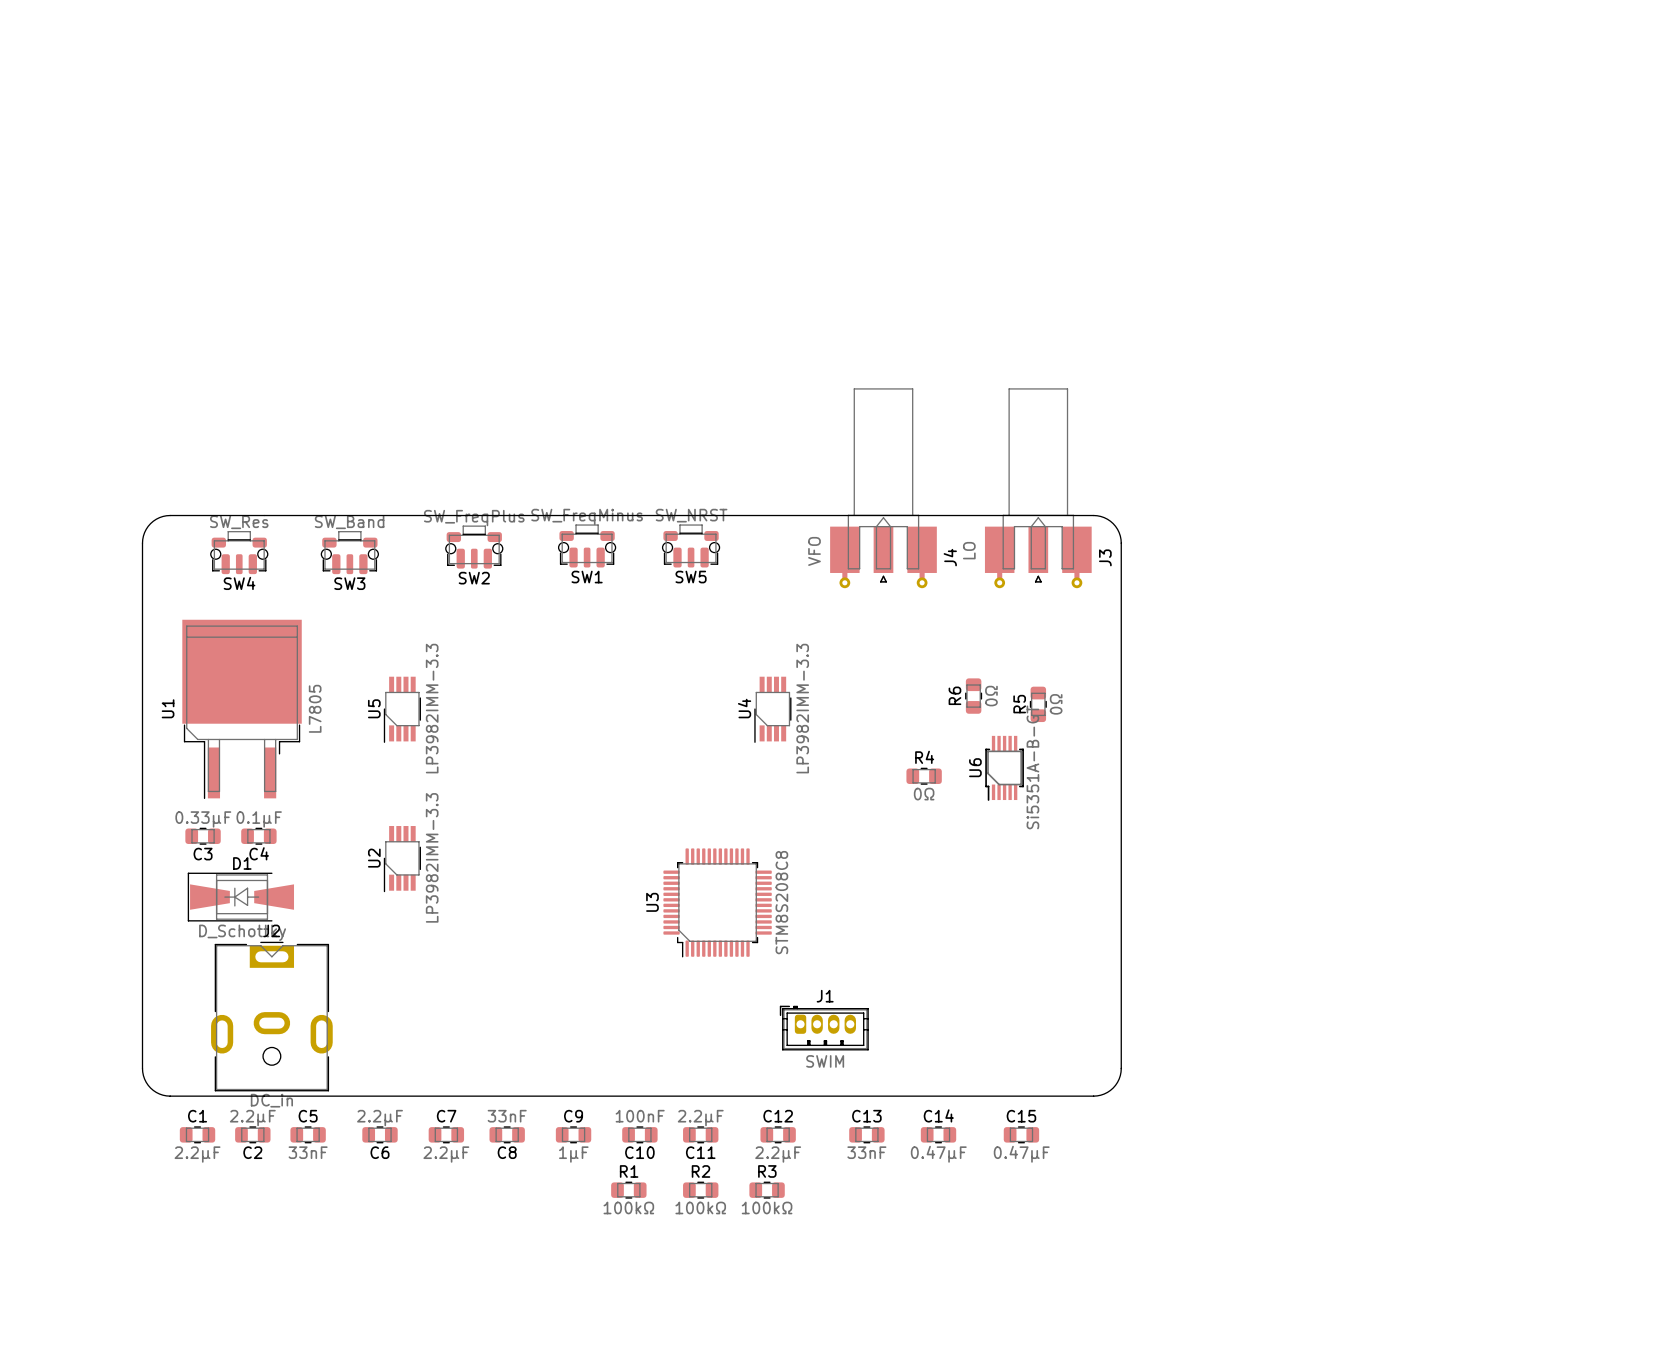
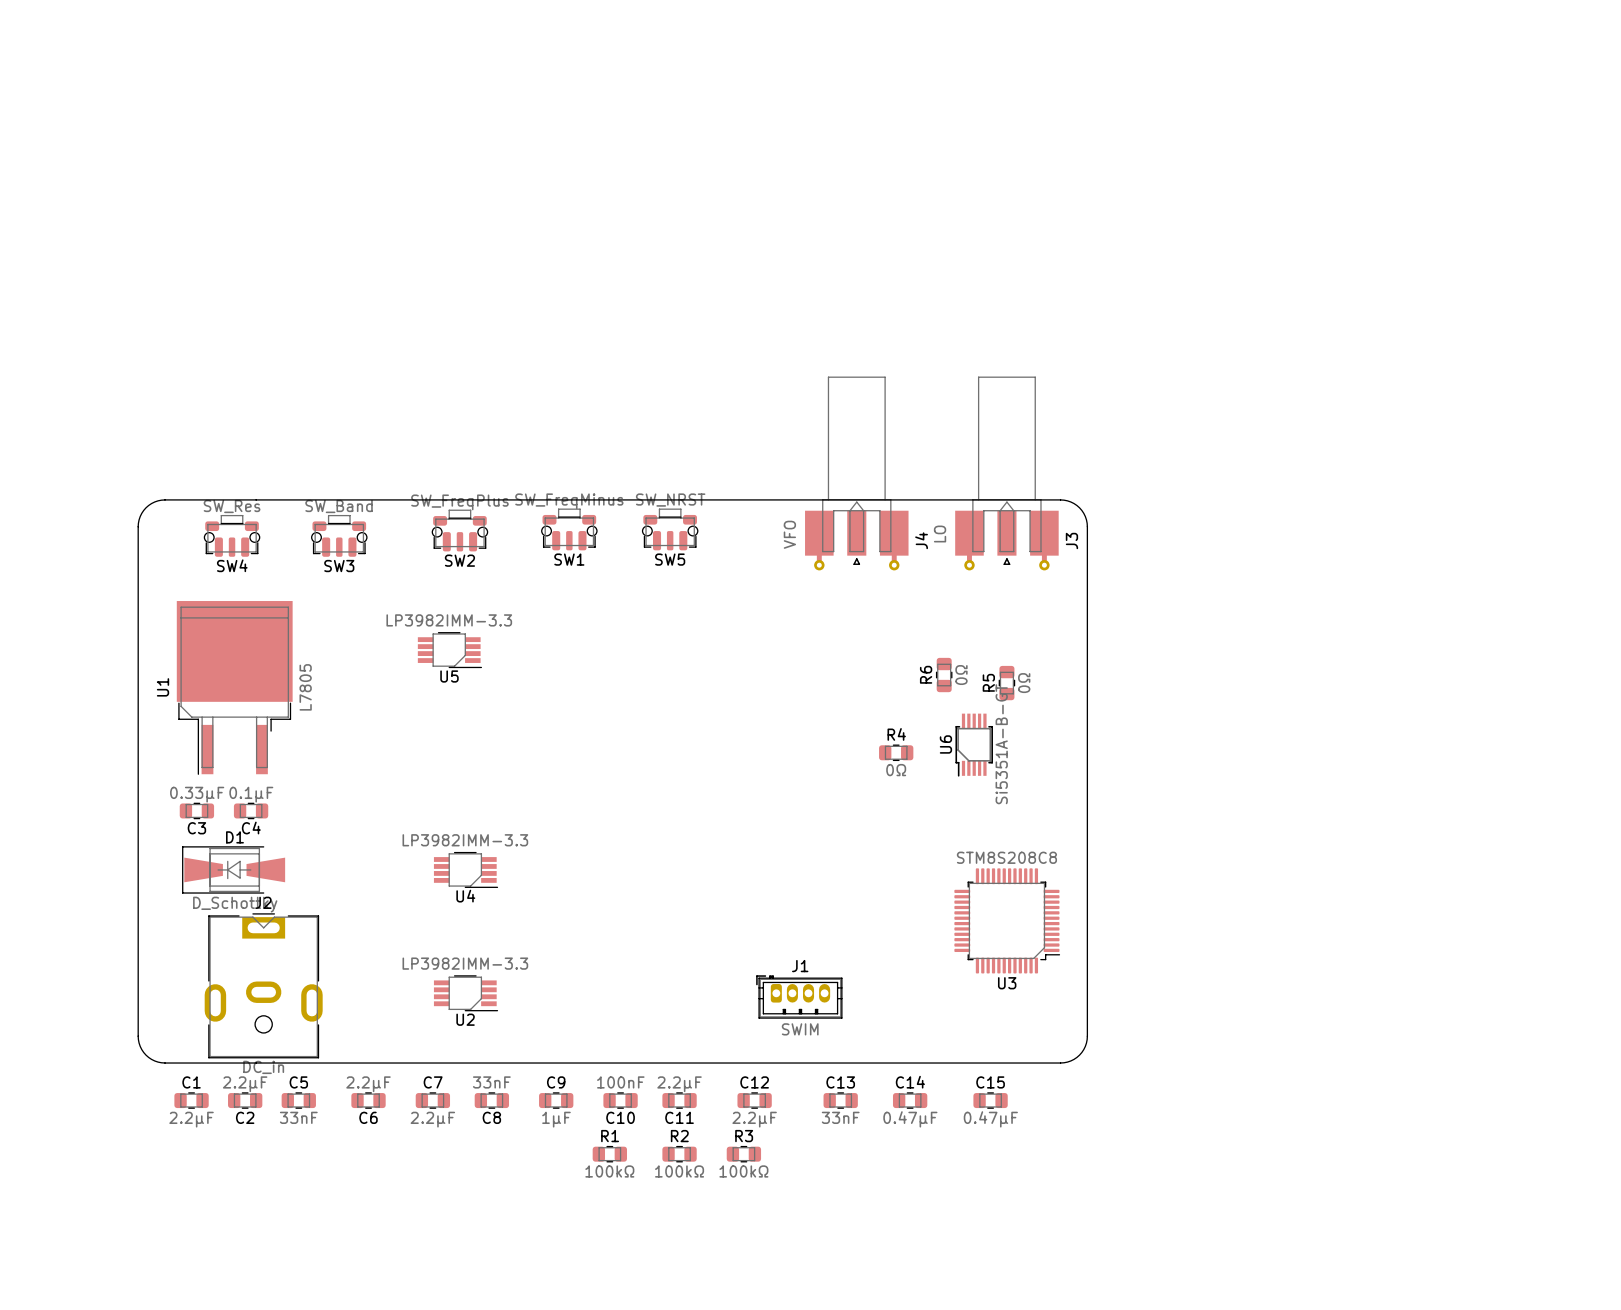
U5 rotation: 0° (402, 709) -> 90° counterclockwise (449, 650)
U5 position: (402, 709) -> (449, 650)
U4 rotation: 0° (772, 709) -> 90° counterclockwise (466, 869)
U4 position: (772, 709) -> (466, 869)
U2 rotation: 0° (402, 859) -> 90° counterclockwise (466, 993)
U2 position: (402, 859) -> (466, 993)
U3 rotation: 0° (717, 902) -> 90° counterclockwise (1007, 920)
U3 position: (717, 902) -> (1007, 920)

